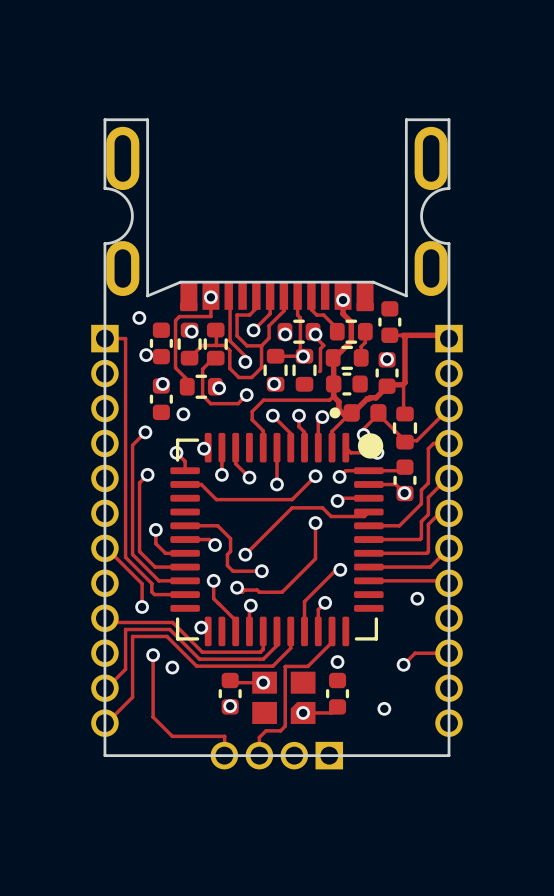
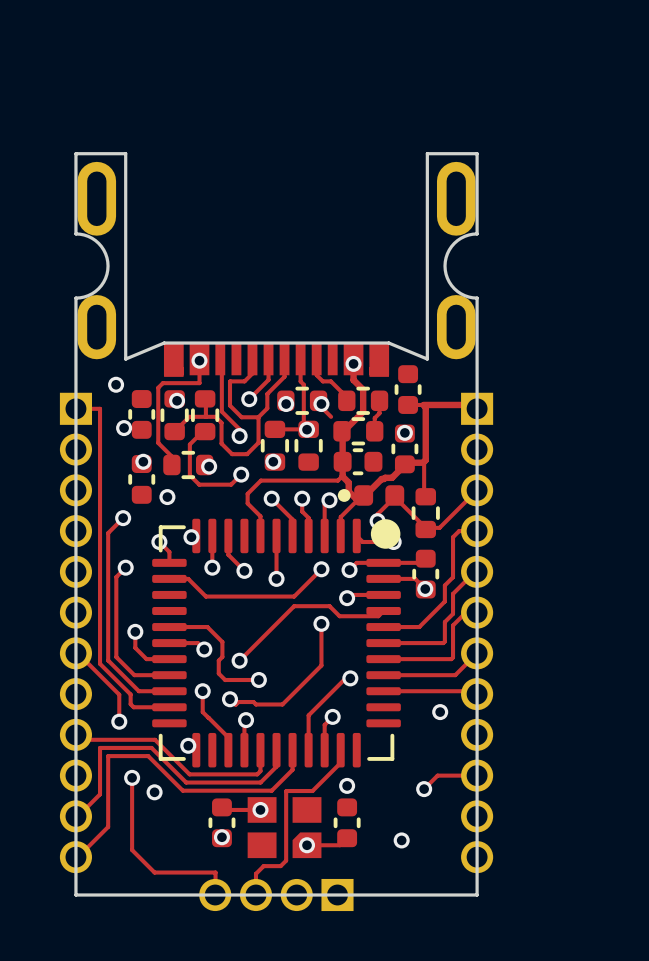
track: (323, 345) (320, 348) (319, 371) -> none

